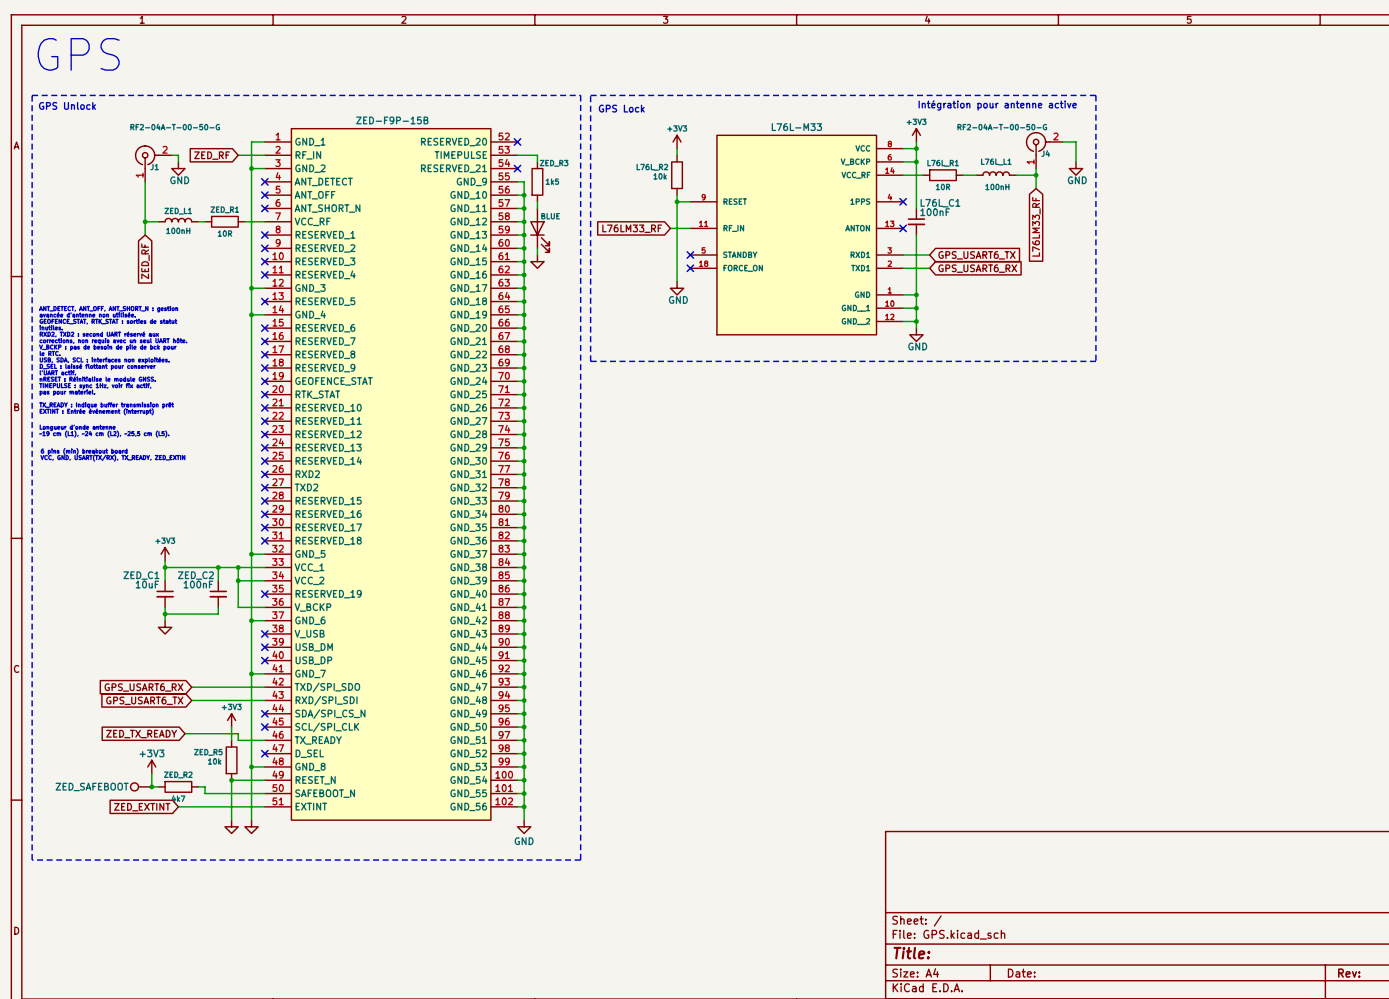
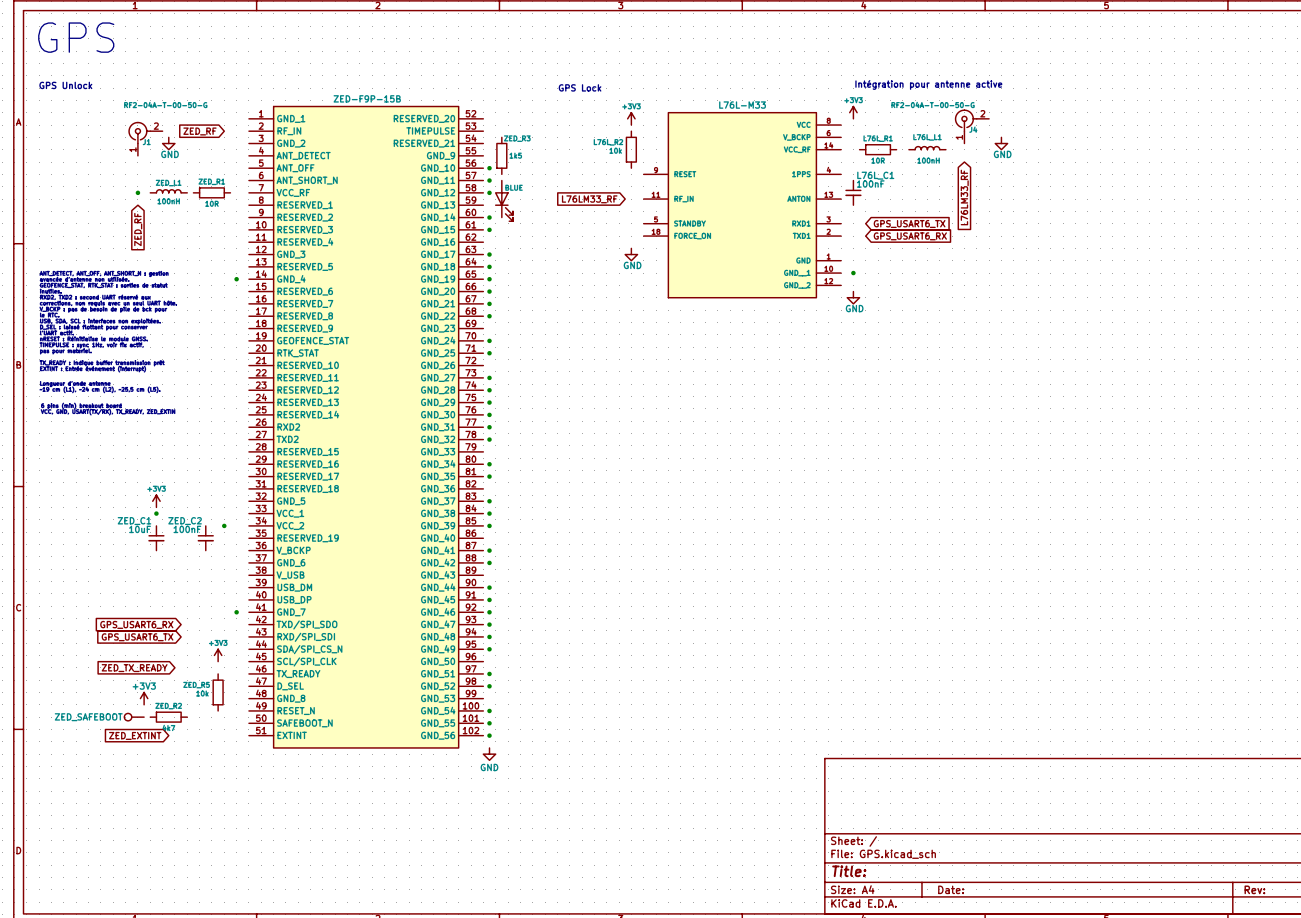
line: (32, 95) (580, 95) (580, 860) (32, 860) (32, 95) -> none
line: (590, 95) (1095, 95) (1095, 361) (590, 361) (590, 95) -> none
wire: (264, 141) (251, 141) (251, 820) -> none
no-connect mark: (517, 141) -> none
wire: (916, 141) (916, 208) -> none
wire: (1062, 141) (1075, 141) (1075, 161) -> none
wire: (677, 148) (677, 155) -> none
wire: (903, 148) (916, 148) -> none
junction: (916, 148) -> none
wire: (171, 155) (178, 155) (178, 161) -> none
wire: (238, 155) (264, 155) -> none
wire: (517, 155) (537, 155) (537, 161) -> none
wire: (903, 161) (916, 161) -> none
junction: (916, 161) -> none
wire: (251, 168) (264, 168) -> none
junction: (251, 168) -> none
no-connect mark: (517, 168) -> none
wire: (1036, 168) (1036, 188) -> none
wire: (903, 175) (923, 175) -> none
wire: (962, 175) (976, 175) -> none
wire: (1016, 175) (1036, 175) -> none
junction: (1036, 175) -> none
wire: (145, 181) (145, 235) -> none
no-connect mark: (264, 181) -> none
wire: (517, 181) (524, 181) (524, 820) -> none
no-connect mark: (264, 195) -> none
wire: (517, 195) (524, 195) -> none
wire: (677, 195) (677, 281) -> none
wire: (537, 201) (537, 208) -> none
wire: (677, 201) (690, 201) -> none
junction: (677, 201) -> none
no-connect mark: (903, 201) -> none
no-connect mark: (264, 208) -> none
wire: (517, 208) (524, 208) -> none
wire: (145, 221) (158, 221) -> none
wire: (198, 221) (204, 221) -> none
wire: (244, 221) (264, 221) -> none
wire: (517, 221) (524, 221) -> none
wire: (670, 228) (690, 228) -> none
no-connect mark: (903, 228) -> none
no-connect mark: (264, 235) -> none
wire: (517, 235) (524, 235) -> none
junction: (524, 235) -> none
wire: (916, 235) (916, 328) -> none
no-connect mark: (264, 248) -> none
wire: (517, 248) (524, 248) -> none
wire: (537, 248) (537, 255) -> none
no-connect mark: (690, 255) -> none
wire: (903, 255) (929, 255) -> none
no-connect mark: (264, 261) -> none
wire: (517, 261) (524, 261) -> none
power symbol: (537, 261) -> none
no-connect mark: (690, 268) -> none
wire: (903, 268) (929, 268) -> none
no-connect mark: (264, 274) -> none
wire: (517, 274) (524, 274) -> none
junction: (524, 274) -> none
wire: (251, 288) (264, 288) -> none
junction: (251, 288) -> none
wire: (517, 288) (524, 288) -> none
wire: (903, 294) (916, 294) -> none
junction: (916, 294) -> none
no-connect mark: (264, 301) -> none
wire: (517, 301) (524, 301) -> none
wire: (903, 308) (916, 308) -> none
wire: (251, 314) (264, 314) -> none
wire: (517, 314) (524, 314) -> none
wire: (903, 321) (916, 321) -> none
junction: (916, 321) -> none
no-connect mark: (264, 328) -> none
wire: (517, 328) (524, 328) -> none
no-connect mark: (264, 341) -> none
wire: (517, 341) (524, 341) -> none
no-connect mark: (264, 354) -> none
wire: (517, 354) (524, 354) -> none
no-connect mark: (264, 368) -> none
wire: (517, 368) (524, 368) -> none
junction: (524, 368) -> none
no-connect mark: (264, 381) -> none
wire: (517, 381) (524, 381) -> none
no-connect mark: (264, 394) -> none
wire: (517, 394) (524, 394) -> none
no-connect mark: (264, 407) -> none
wire: (517, 407) (524, 407) -> none
junction: (524, 407) -> none
no-connect mark: (264, 421) -> none
wire: (517, 421) (524, 421) -> none
no-connect mark: (264, 434) -> none
wire: (517, 434) (524, 434) -> none
no-connect mark: (264, 447) -> none
wire: (517, 447) (524, 447) -> none
no-connect mark: (264, 461) -> none
wire: (517, 461) (524, 461) -> none
no-connect mark: (264, 474) -> none
wire: (517, 474) (524, 474) -> none
no-connect mark: (264, 487) -> none
wire: (517, 487) (524, 487) -> none
no-connect mark: (264, 501) -> none
wire: (517, 501) (524, 501) -> none
junction: (524, 501) -> none
no-connect mark: (264, 514) -> none
wire: (517, 514) (524, 514) -> none
no-connect mark: (264, 527) -> none
wire: (517, 527) (524, 527) -> none
no-connect mark: (264, 540) -> none
wire: (517, 540) (524, 540) -> none
junction: (524, 540) -> none
wire: (251, 554) (264, 554) -> none
junction: (251, 554) -> none
wire: (517, 554) (524, 554) -> none
wire: (165, 560) (165, 580) -> none
wire: (165, 567) (264, 567) -> none
wire: (218, 567) (218, 580) -> none
junction: (218, 567) -> none
wire: (238, 567) (238, 607) (264, 607) -> none
junction: (238, 567) -> none
wire: (517, 567) (524, 567) -> none
wire: (238, 580) (264, 580) -> none
wire: (517, 580) (524, 580) -> none
no-connect mark: (264, 594) -> none
wire: (517, 594) (524, 594) -> none
junction: (524, 594) -> none
wire: (165, 607) (165, 620) -> none
wire: (218, 607) (218, 614) (165, 614) -> none
wire: (517, 607) (524, 607) -> none
junction: (165, 614) -> none
wire: (251, 620) (264, 620) -> none
junction: (251, 620) -> none
wire: (517, 620) (524, 620) -> none
power symbol: (165, 627) -> none
no-connect mark: (264, 633) -> none
wire: (517, 633) (524, 633) -> none
junction: (524, 633) -> none
no-connect mark: (264, 647) -> none
wire: (517, 647) (524, 647) -> none
no-connect mark: (264, 660) -> none
wire: (517, 660) (524, 660) -> none
wire: (251, 673) (264, 673) -> none
wire: (517, 673) (524, 673) -> none
wire: (191, 687) (264, 687) -> none
wire: (517, 687) (524, 687) -> none
wire: (191, 700) (264, 700) -> none
wire: (517, 700) (524, 700) -> none
no-connect mark: (264, 713) -> none
wire: (517, 713) (524, 713) -> none
wire: (231, 727) (231, 740) -> none
no-connect mark: (264, 727) -> none
wire: (517, 727) (524, 727) -> none
junction: (524, 727) -> none
wire: (185, 733) (238, 733) (238, 740) (264, 740) -> none
wire: (517, 740) (524, 740) -> none
no-connect mark: (264, 753) -> none
wire: (517, 753) (524, 753) -> none
wire: (251, 766) (264, 766) -> none
junction: (251, 766) -> none
wire: (517, 766) (524, 766) -> none
junction: (524, 766) -> none
wire: (151, 773) (151, 786) (158, 786) -> none
junction: (231, 780) -> none
wire: (264, 780) (231, 780) (231, 820) -> none
wire: (517, 780) (524, 780) -> none
junction: (151, 786) -> none
wire: (198, 786) (204, 786) (204, 793) (264, 793) -> none
wire: (517, 793) (524, 793) -> none
wire: (178, 806) (264, 806) -> none
wire: (517, 806) (524, 806) -> none
power symbol: (231, 826) -> none
power symbol: (251, 826) -> none

